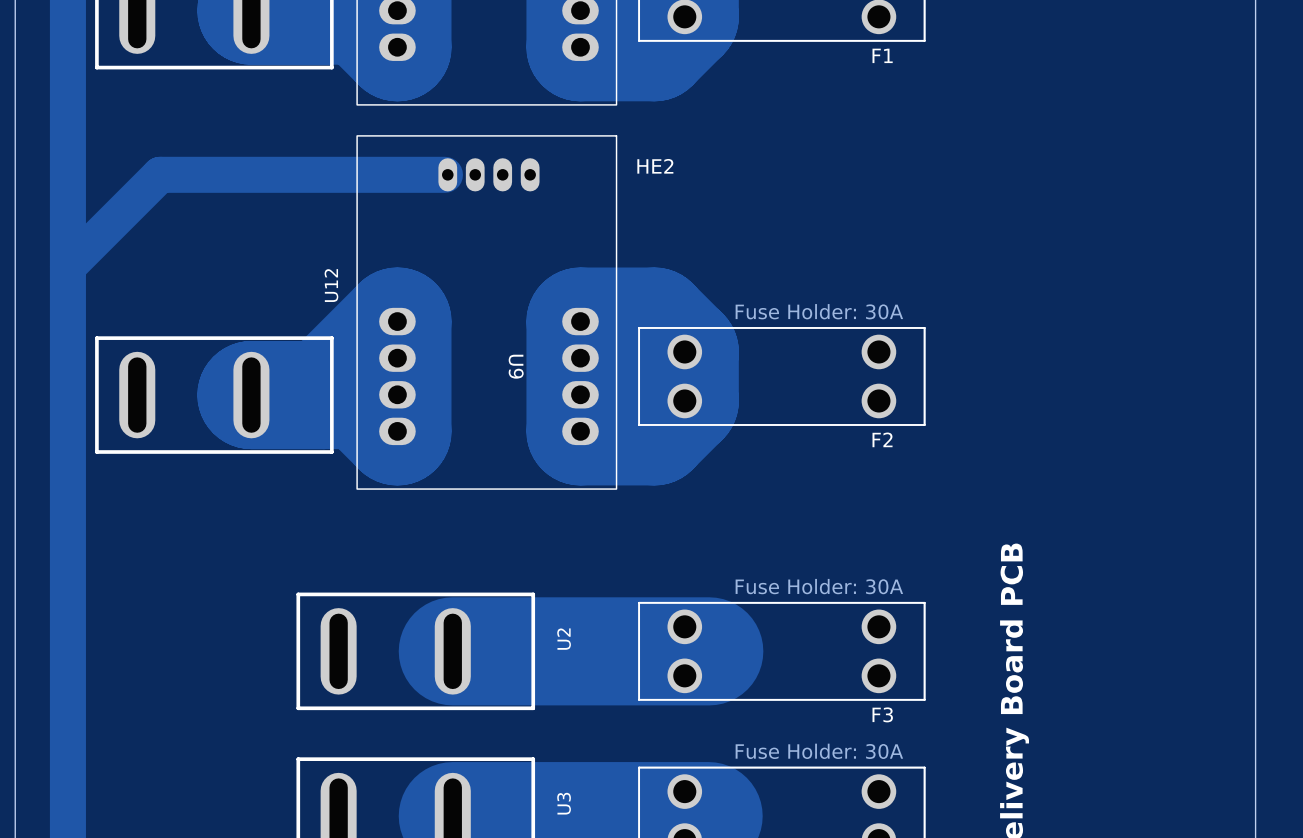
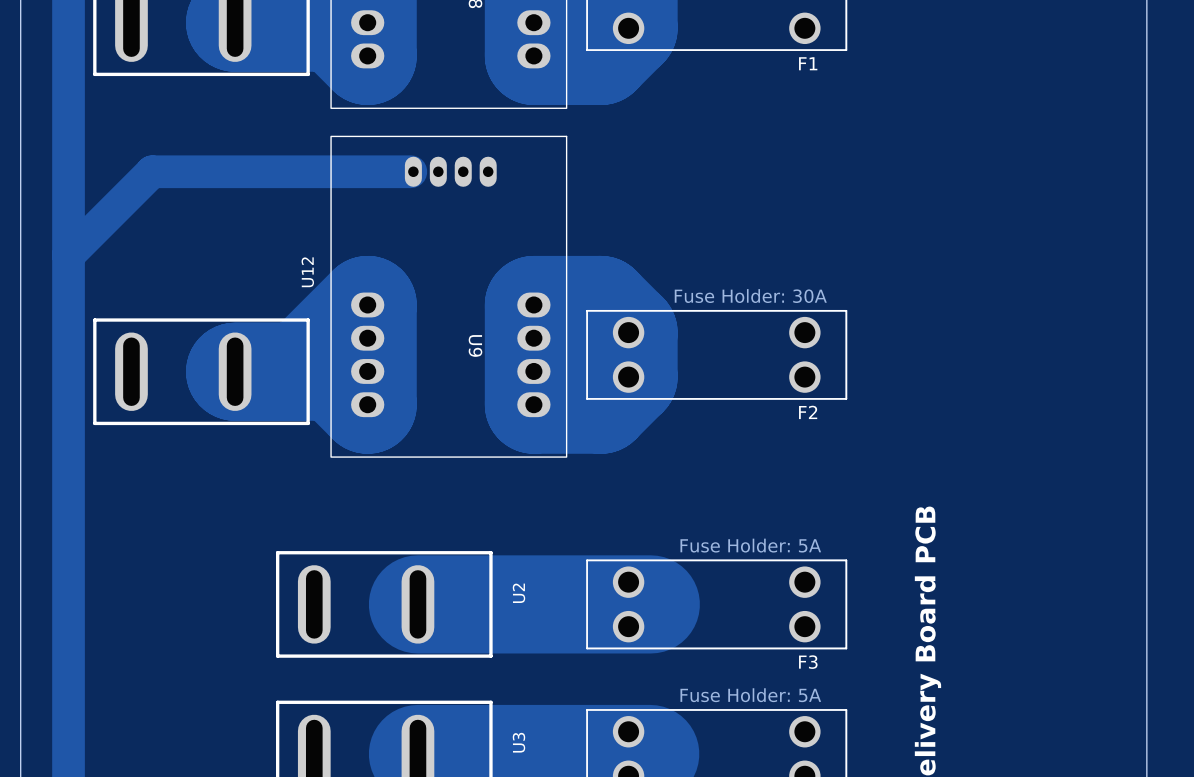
text: HE2 (655, 166) -> none
F3 value: Fuse Holder: 30A (819, 586) -> Fuse Holder: 5A (750, 545)
part value: Fuse Holder: 30A (819, 751) -> Fuse Holder: 5A (750, 695)

